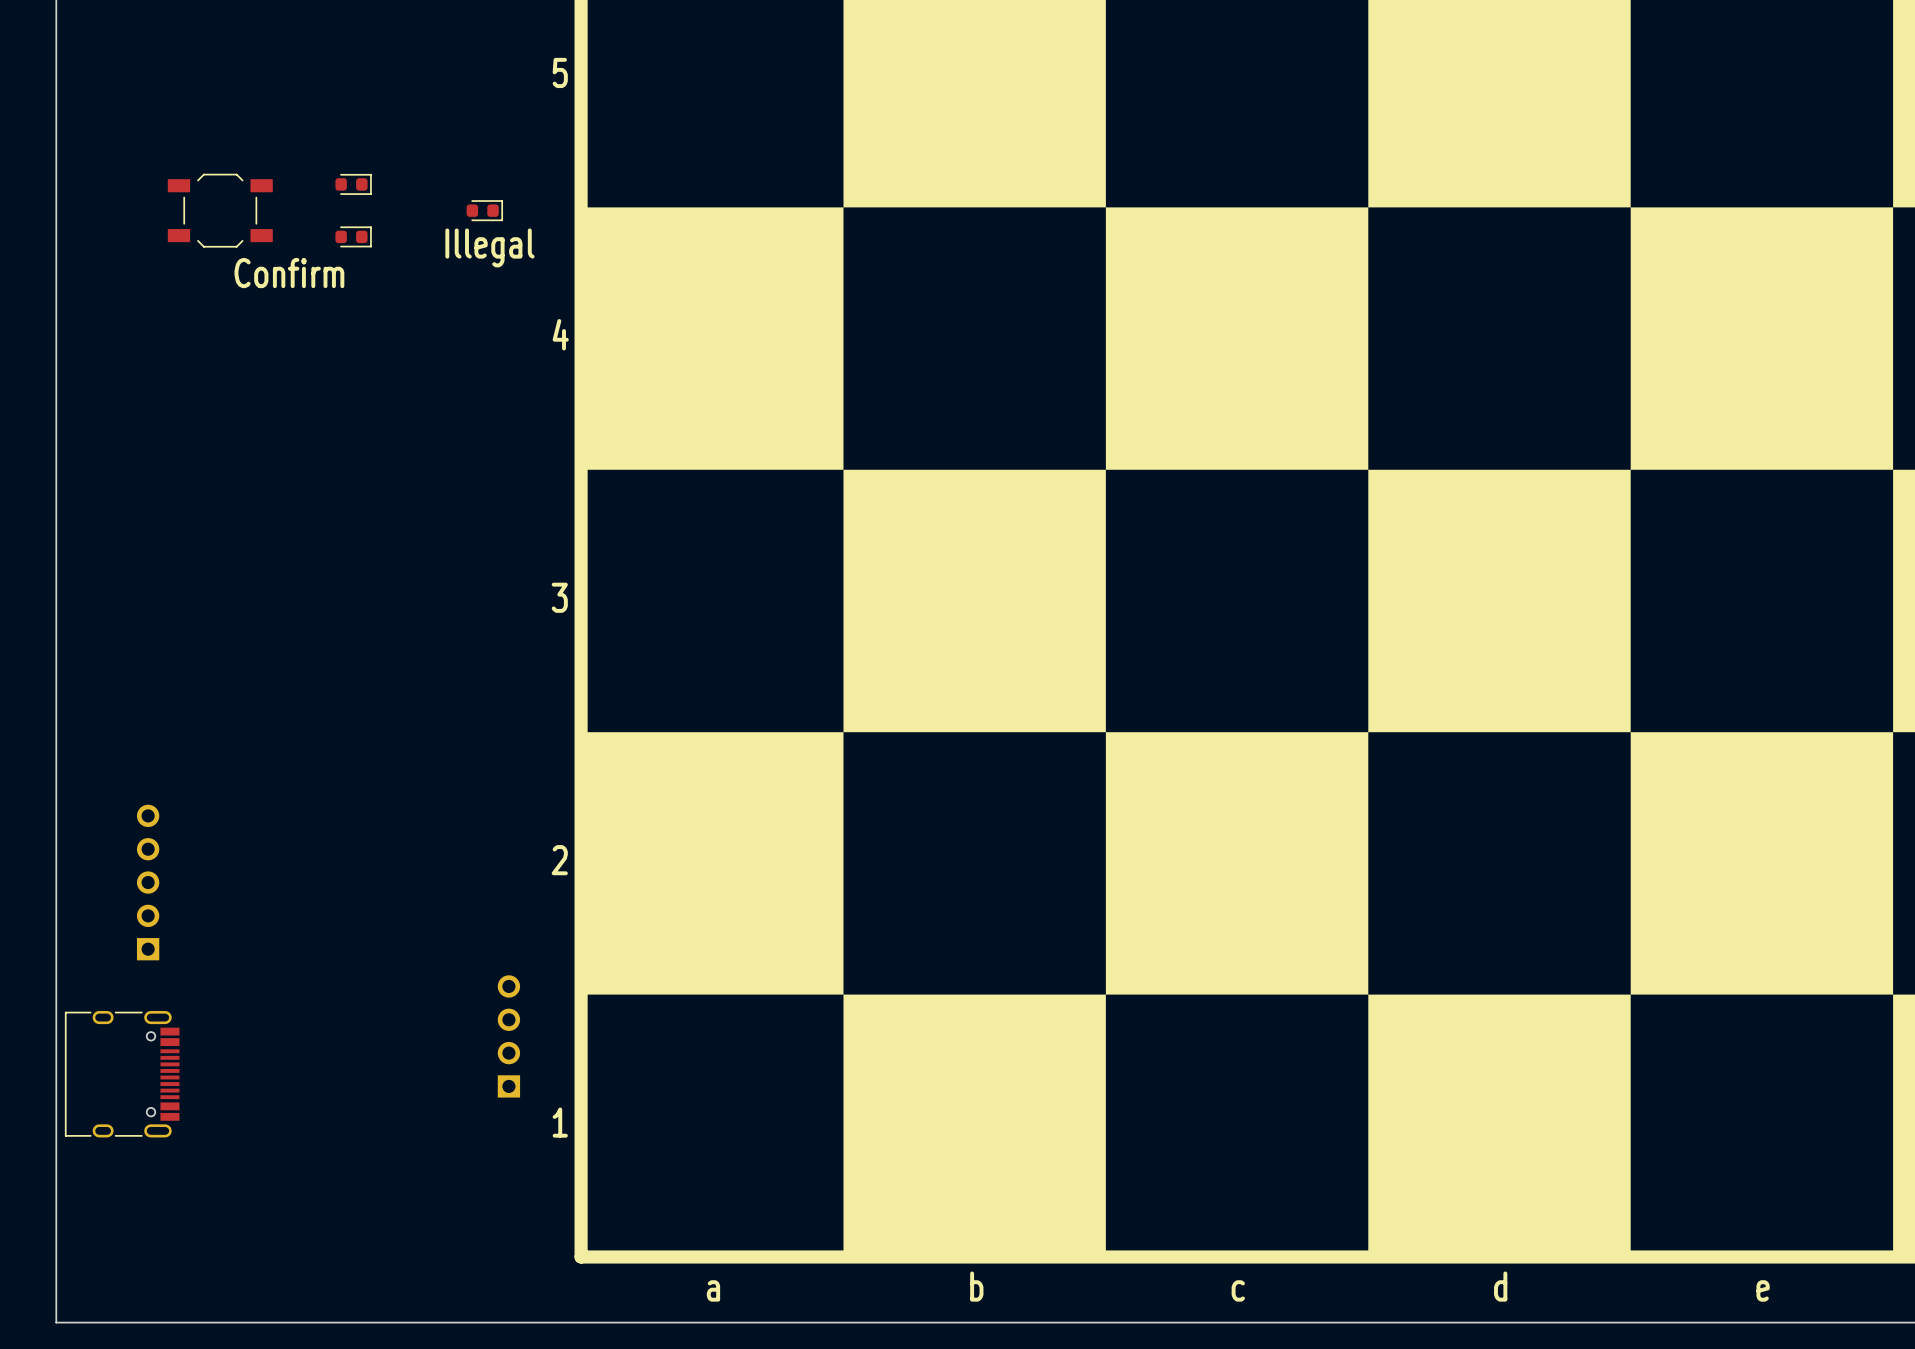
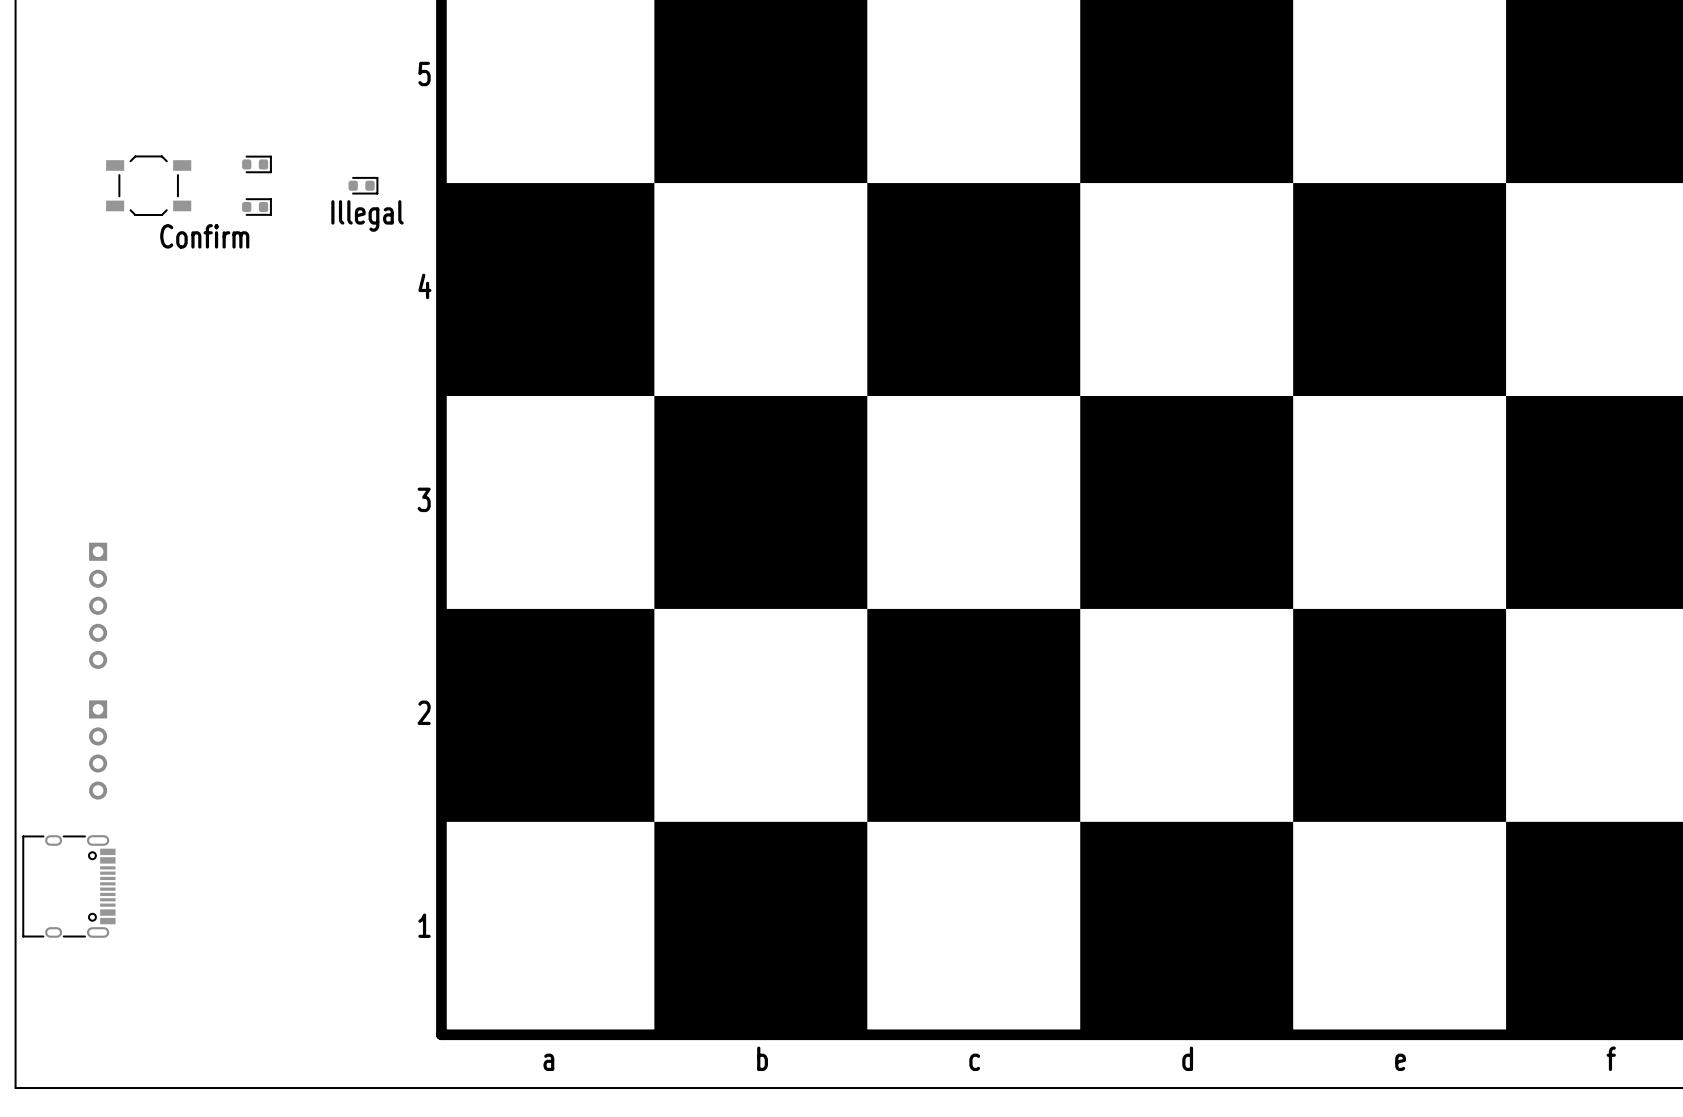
part rotation: 0° (148, 882) -> 180° (98, 605)
part position: (148, 882) -> (98, 605)
part: none -> (98, 749)
part: (508, 1036) -> none

